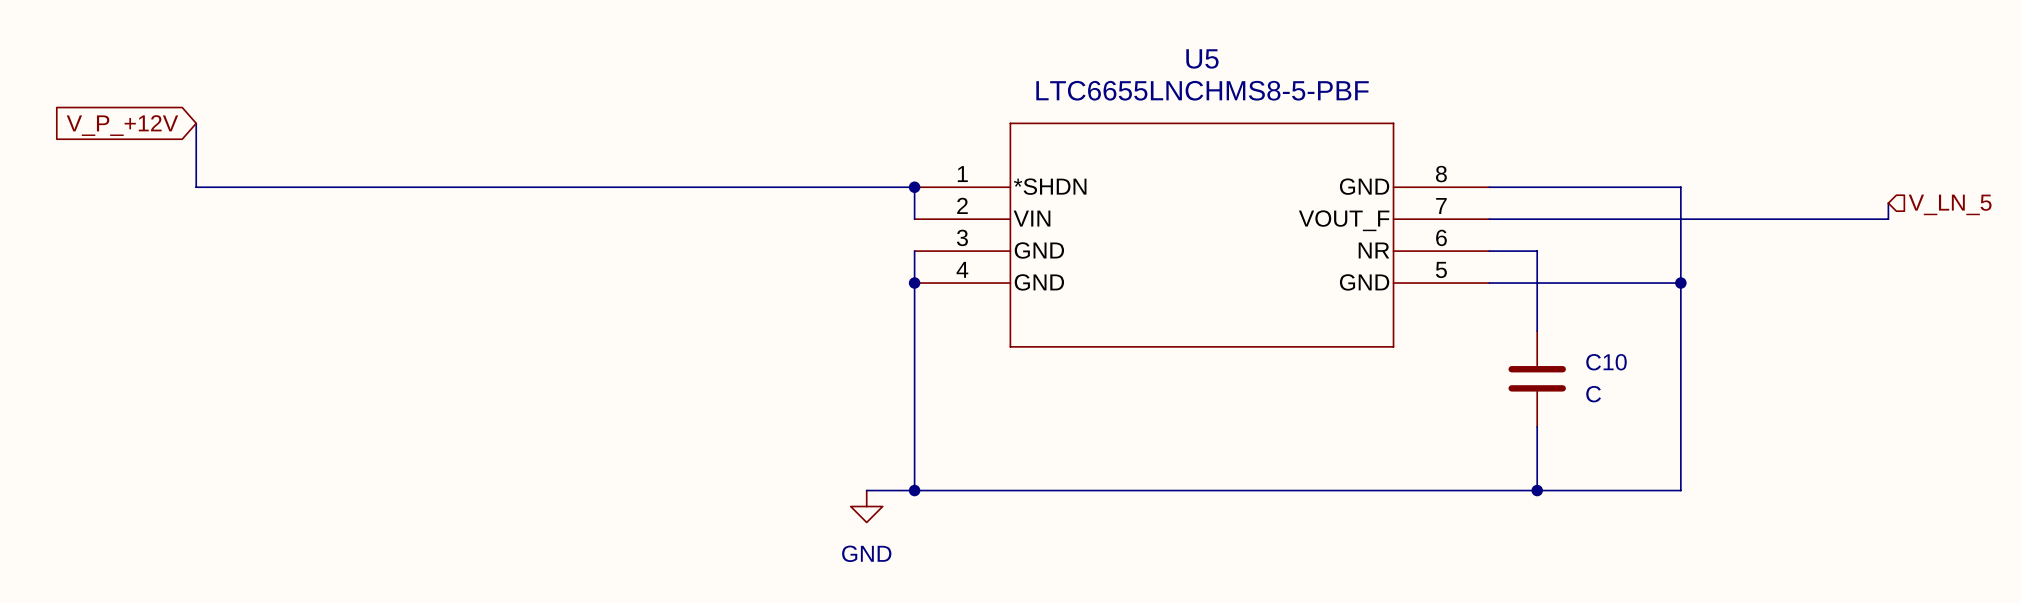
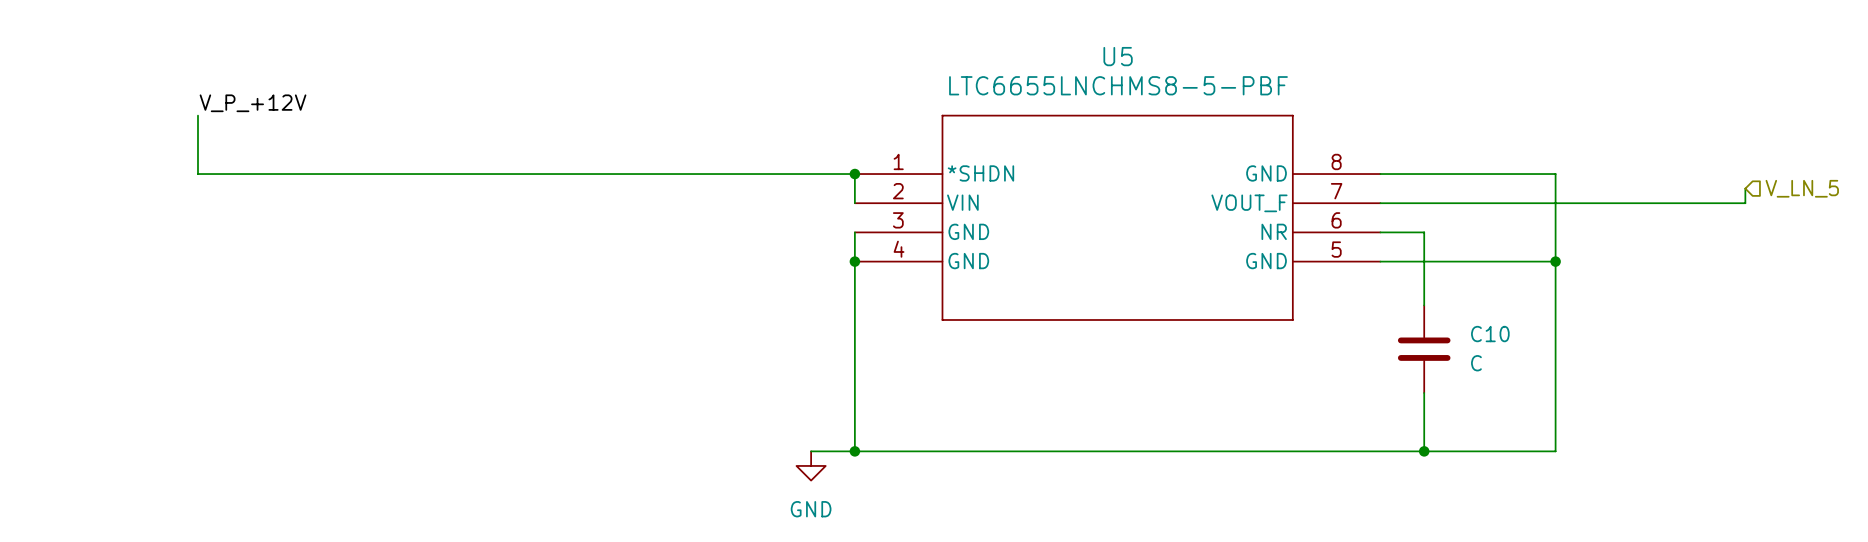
label: none -> V_P_+12V (253, 103)
global label: V_P_+12V (122, 125) -> none

